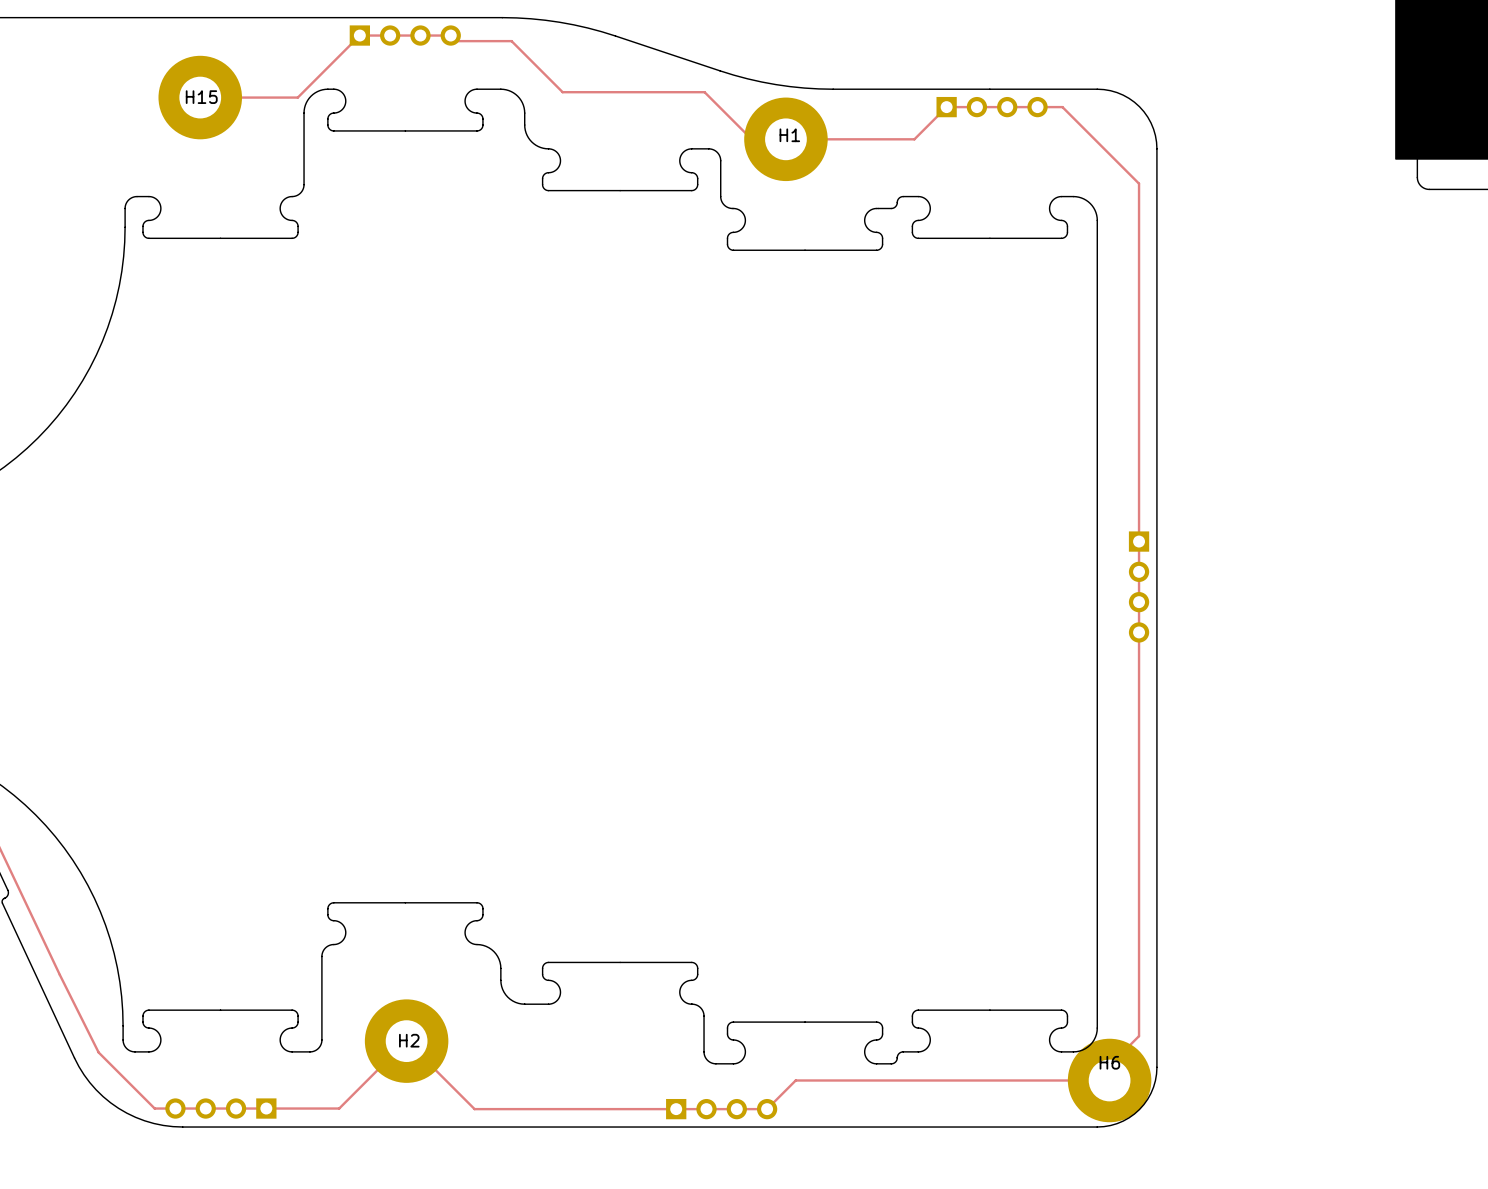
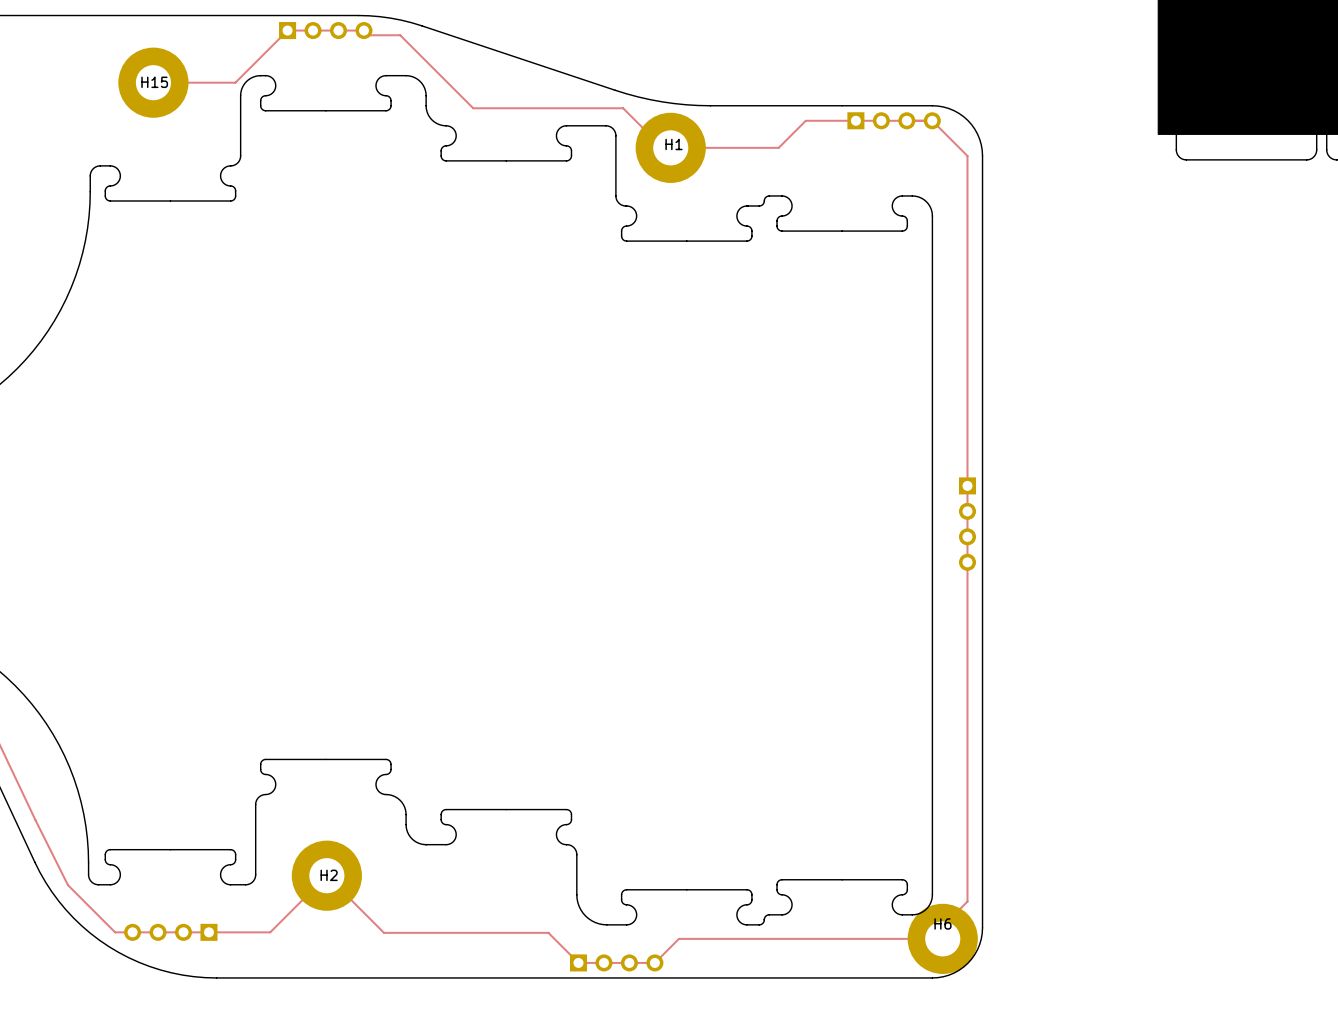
board edge: (444, 17) (516, 17) (573, 24) (615, 36) (733, 75) (790, 86) (833, 89) (1097, 89) -> (358, 15) (390, 18) (411, 22) (615, 90) (662, 101) (710, 105) (932, 105)
track: (493, 41) (511, 41) (562, 92) (704, 92) (751, 139) (914, 139) (946, 107) (1062, 107) (1139, 183) (1139, 1036) (1109, 1065) (1109, 1080) (795, 1080) (767, 1109) (670, 1109) -> (400, 35) (473, 108) (623, 108) (662, 147) (778, 147) (805, 120) (932, 120) (967, 155) (967, 901) (942, 926) (942, 938) (678, 938) (654, 962) (578, 962) (548, 932)
board edge: (1097, 89) (1116, 92) (1139, 106) (1153, 129) (1156, 148) (1156, 1067) (1151, 1093) (1139, 1109) (1116, 1123) (1097, 1127) (173, 1126) (153, 1123) (135, 1117) (118, 1108) (103, 1096) (89, 1082) (78, 1066) (59, 1024) -> (932, 105) (954, 110) (967, 120) (979, 139) (982, 155) (982, 927) (977, 949) (963, 967) (948, 975) (932, 977) (193, 976) (160, 969) (138, 962) (99, 940) (73, 917) (58, 900) (34, 862)
part position: (992, 107) -> (894, 120)
H1 position: (785, 139) -> (670, 147)
board edge: (708, 148) (716, 151) (720, 158) (721, 201) (727, 207) (740, 210) (745, 217) (742, 228) (727, 236) (727, 245) (731, 250) (878, 250) (882, 245) (882, 236) (866, 227) (864, 220) (866, 214) (873, 208) (893, 208) (898, 198) (903, 196) (921, 196) (929, 204) (930, 209) (927, 216) (912, 224) (912, 233) (916, 238) (1062, 238) (1067, 233) (1067, 224) (1053, 216) (1049, 211) (1049, 205) (1056, 197) (1073, 196) (1086, 200) (1095, 212) (1097, 262) -> (580, 125) (608, 126) (615, 132) (616, 198) (620, 204) (632, 208) (636, 214) (633, 223) (621, 229) (621, 237) (625, 240) (748, 240) (751, 237) (751, 229) (738, 222) (737, 212) (744, 206) (761, 205) (765, 197) (769, 195) (784, 196) (791, 202) (789, 212) (777, 219) (777, 227) (780, 230) (902, 231) (907, 226)
board edge: none -> (907, 221) (905, 217) (897, 214) (893, 211) (892, 204) (895, 198) (901, 196) (914, 196) (926, 201) (932, 216) (932, 897) (929, 904) (922, 912) (914, 914) (901, 914) (894, 911) (892, 903) (895, 897) (906, 891) (907, 883) (903, 879) (781, 879) (777, 883) (777, 891) (788, 897) (792, 904) (789, 911) (782, 914)
board edge: (1097, 268) (1096, 1034) (1092, 1042) (1082, 1050) (1060, 1051) (1051, 1046) (1049, 1038) (1053, 1031) (1066, 1024) (1067, 1014) (1063, 1010) (917, 1010) (912, 1014) (912, 1024) (926, 1031) (930, 1039) (927, 1047) (918, 1051) -> none
part position: (1139, 587) -> (967, 524)
board edge: (704, 1051) (706, 1059) (712, 1063) (734, 1063) (742, 1059) (745, 1053) (744, 1046) (739, 1041) (730, 1039) (727, 1035) (727, 1025) (732, 1022) (876, 1022) (882, 1025) (882, 1035) (879, 1039) (871, 1041) (866, 1046) (865, 1054) (869, 1061) (875, 1063) (892, 1063) (900, 1052) (918, 1051) -> (576, 884) (576, 894)
board edge: none -> (576, 894) (579, 906) (585, 916) (595, 922) (602, 924) (627, 924) (634, 920) (636, 914) (634, 909) (621, 900) (622, 892) (626, 889) (747, 889) (751, 892) (751, 900) (738, 910) (737, 917) (741, 923) (760, 924) (767, 915) (782, 914)
H6 position: (1109, 1080) -> (942, 938)
part position: (721, 1109) -> (616, 962)

